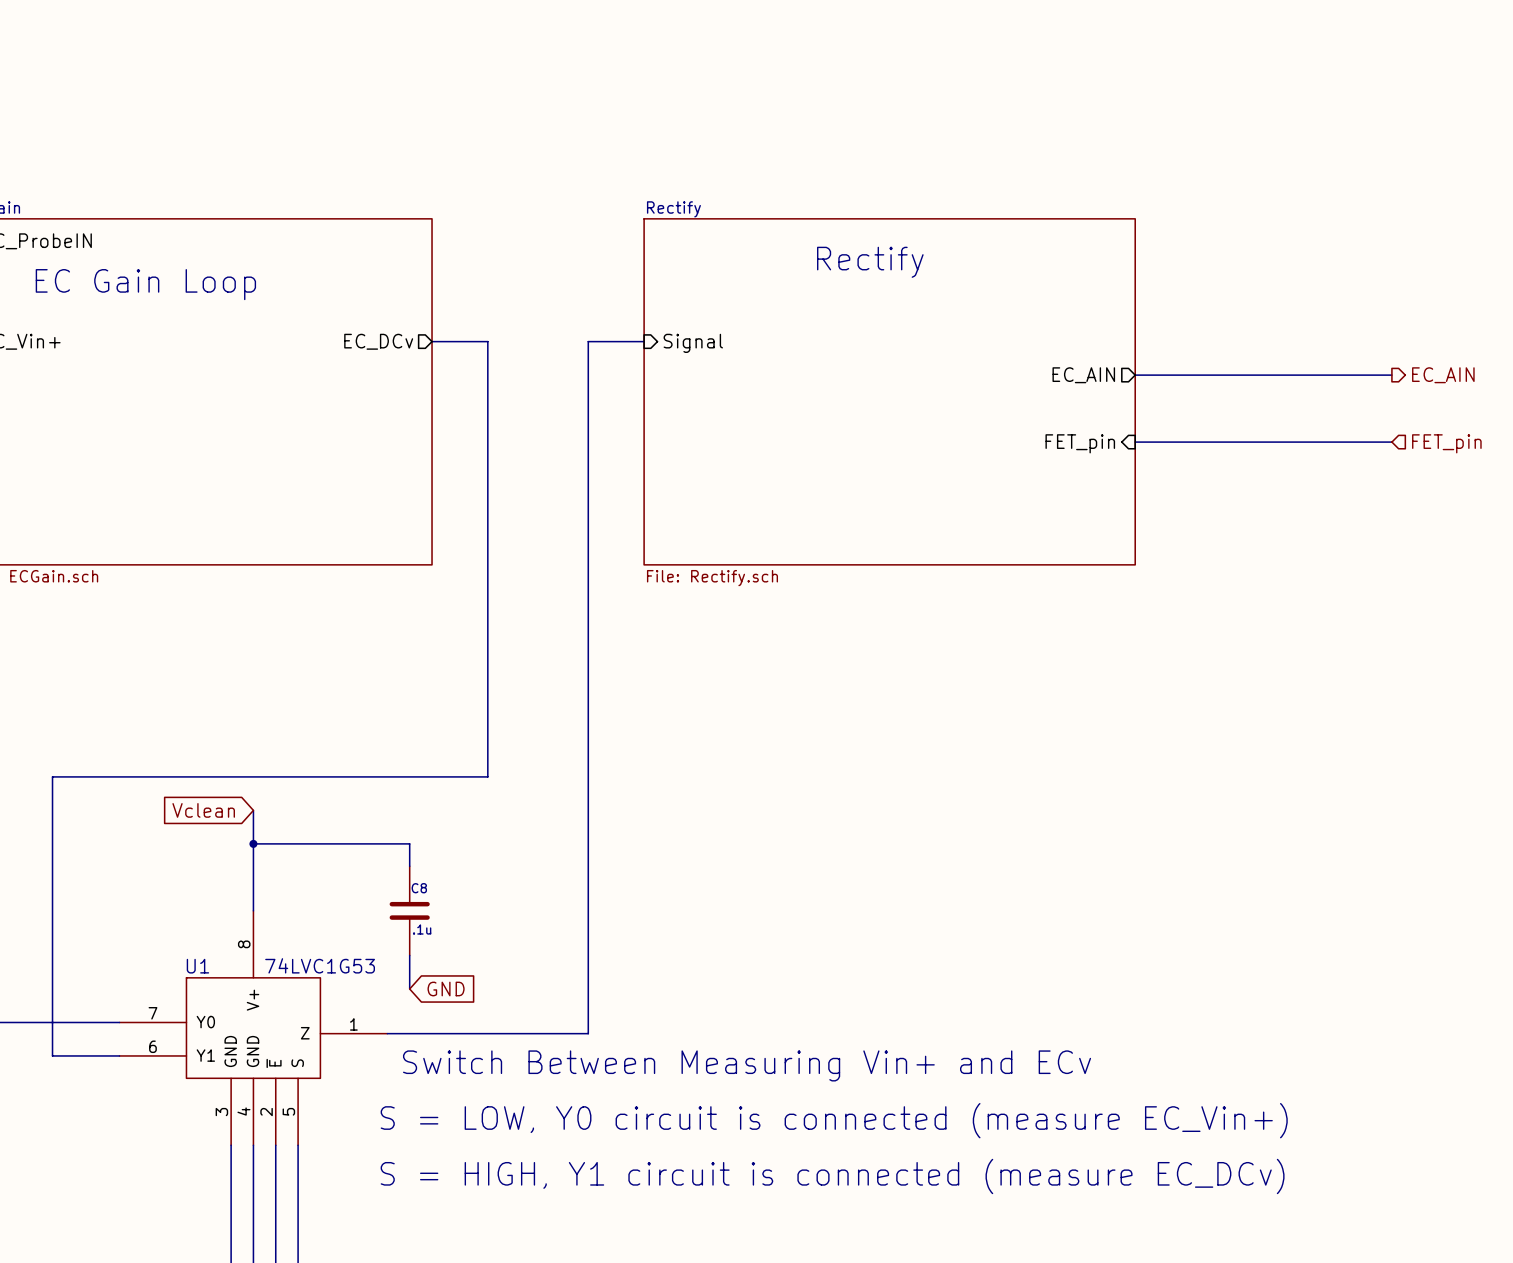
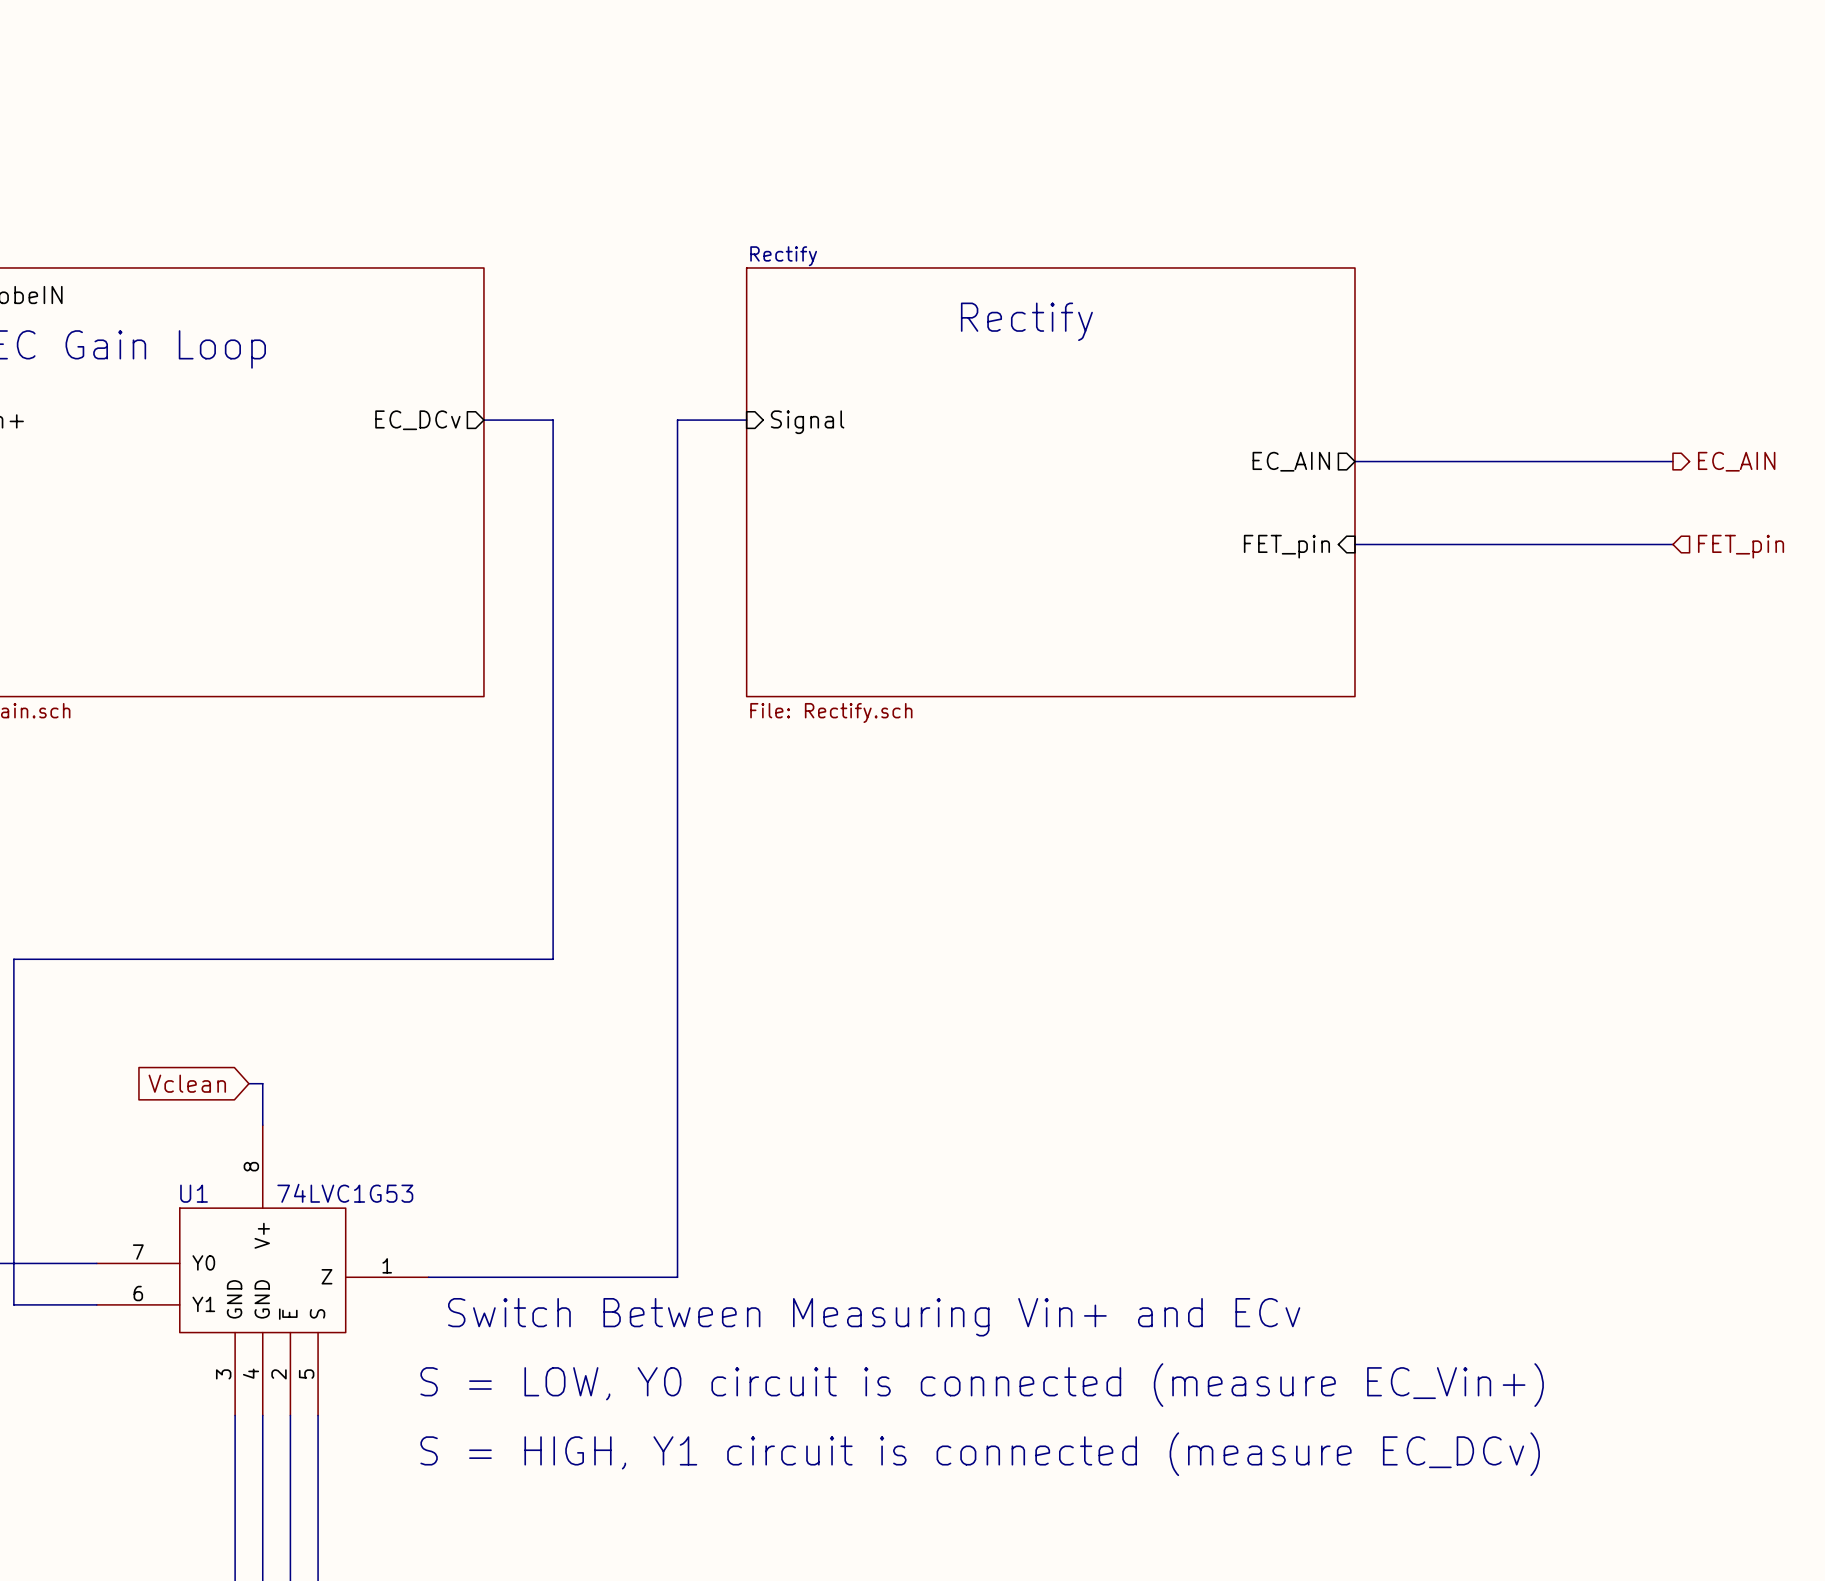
global label position: Vclean (203, 810) -> Vclean (187, 1083)
wire: (253, 810) (253, 877) -> (248, 1083) (262, 1083)
wire: (253, 843) (409, 843) (409, 866) -> none
junction: (253, 843) -> none
C8: .1u (409, 910) -> none
wire: (409, 955) (409, 989) -> none
global label: GND (446, 989) -> none

